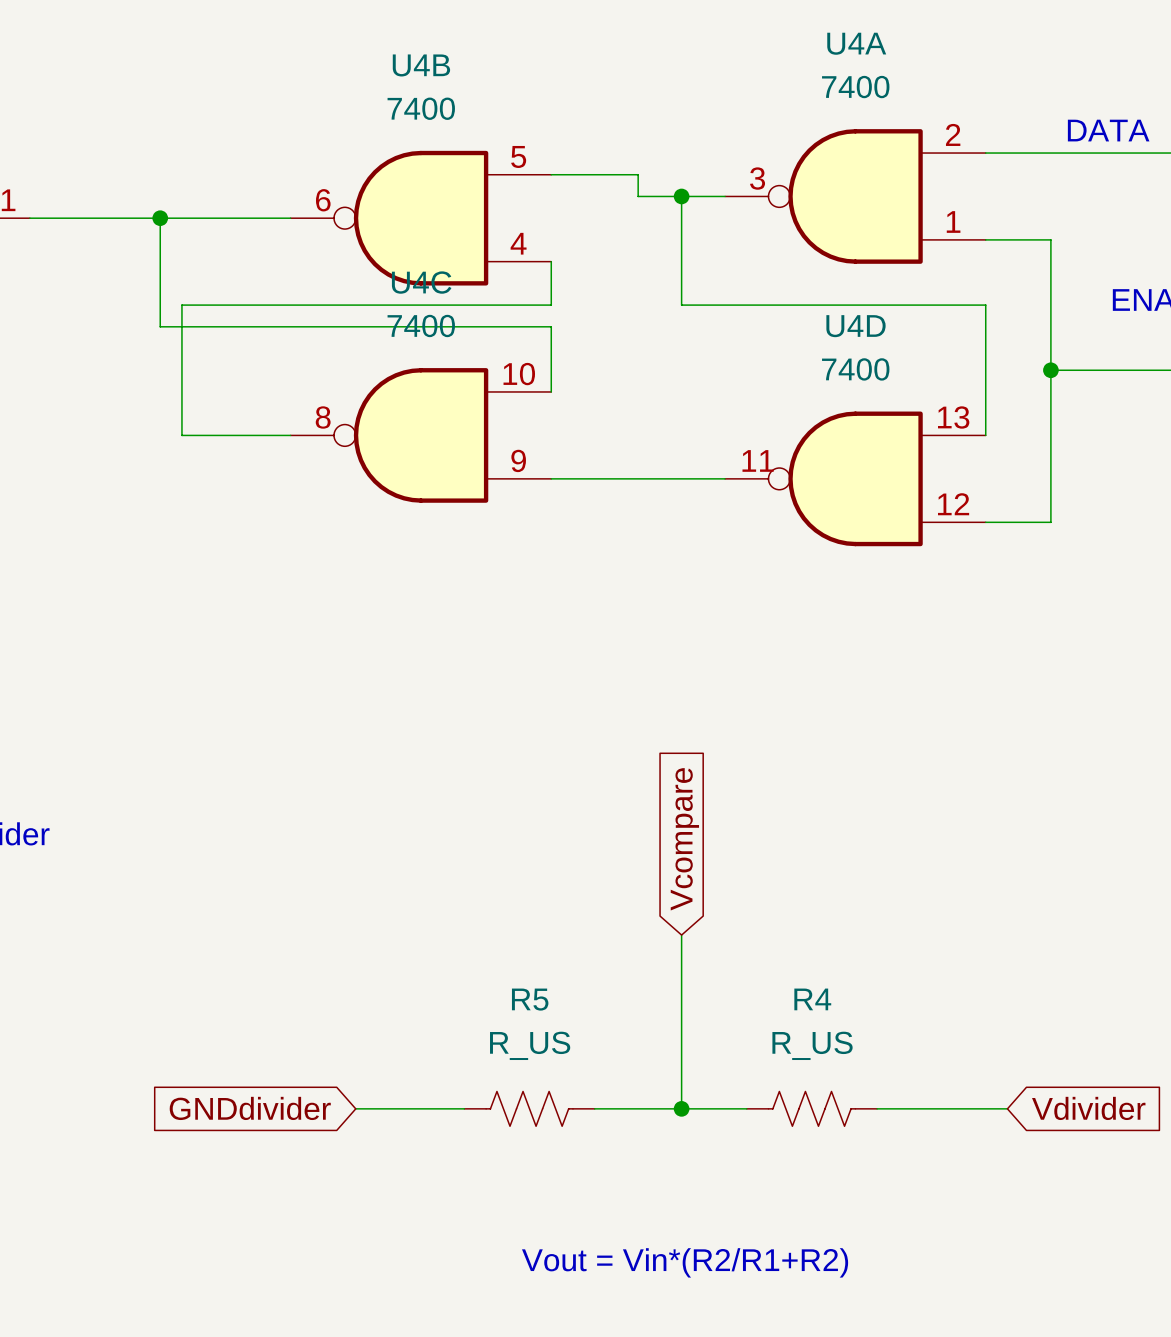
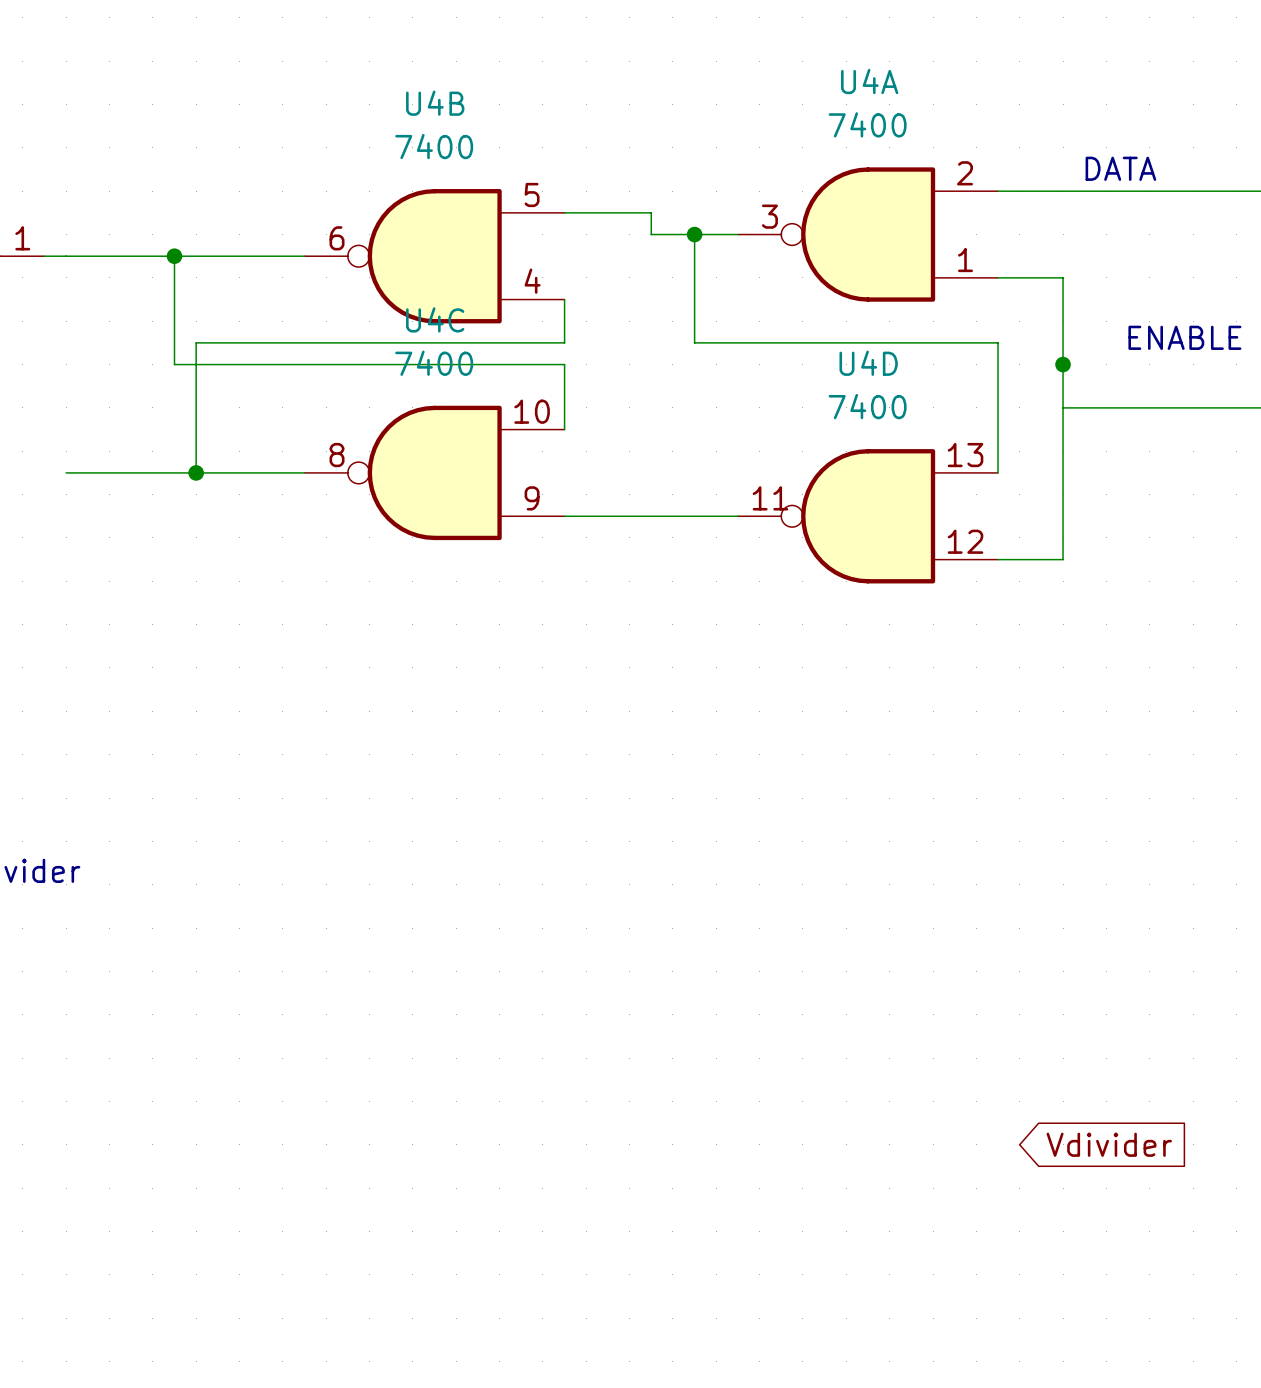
junction position: (1050, 370) -> (1063, 364)
wire: none -> (66, 472) (196, 472)
junction: none -> (196, 472)
global label: Vcompare (684, 839) -> none
wire: (681, 935) (681, 1108) -> none
global label: GNDdivider (250, 1108) -> none
wire: (355, 1108) (464, 1108) -> none
R5: R_US (529, 1108) -> none
wire: (594, 1108) (746, 1108) -> none
junction: (681, 1108) -> none
R4: R_US (811, 1108) -> none
wire: (877, 1108) (1007, 1108) -> none
text: Vout = Vin*(R2/R1+R2) (685, 1262) -> none

